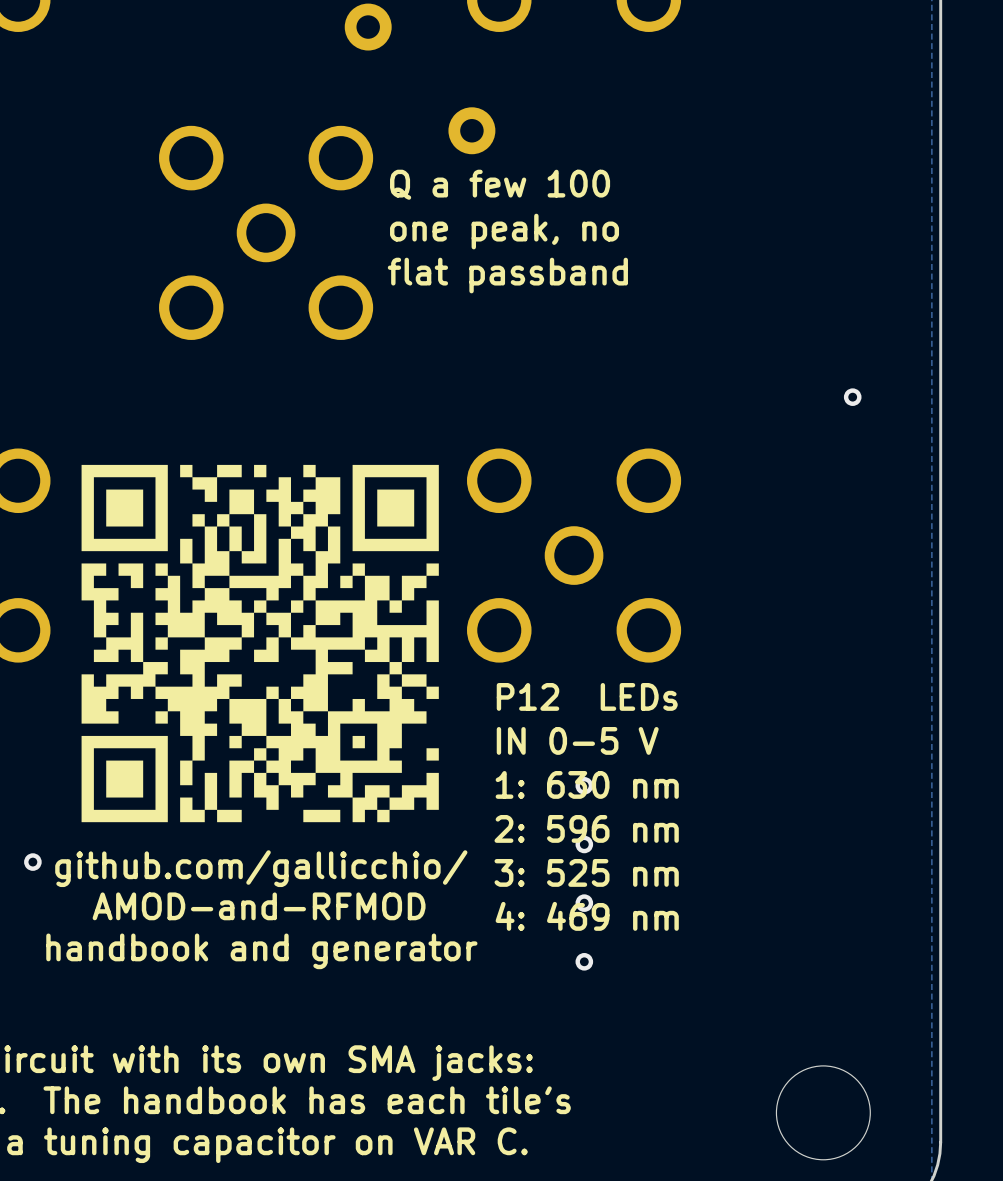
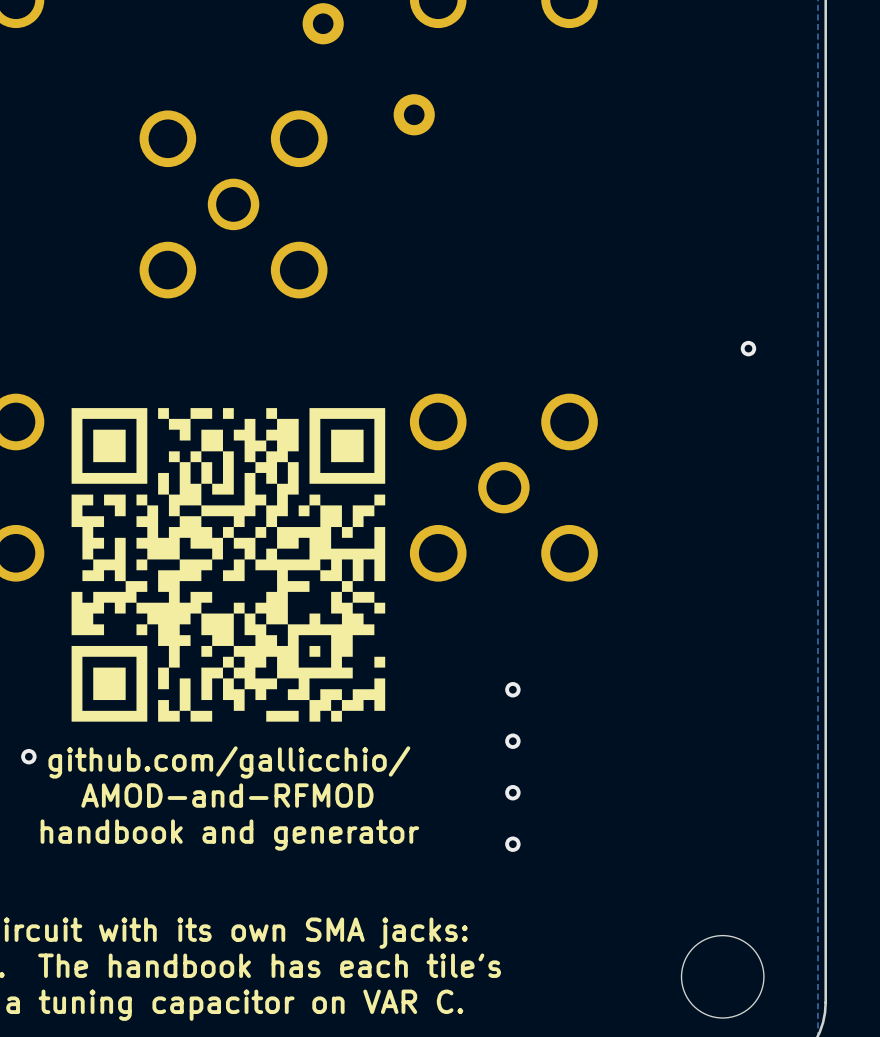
text: Q a few 100 (500, 184) -> none
text: one peak, no (504, 231) -> none
text: flat passband (507, 275) -> none
text: P12 LEDs (587, 696) -> none
text: IN 0-5 V (577, 740) -> none
text: 1: 630 nm (587, 784) -> none
text: 2: 596 nm (586, 828) -> none
text: 3: 525 nm (586, 872) -> none
text: 4: 469 nm (587, 916) -> none

